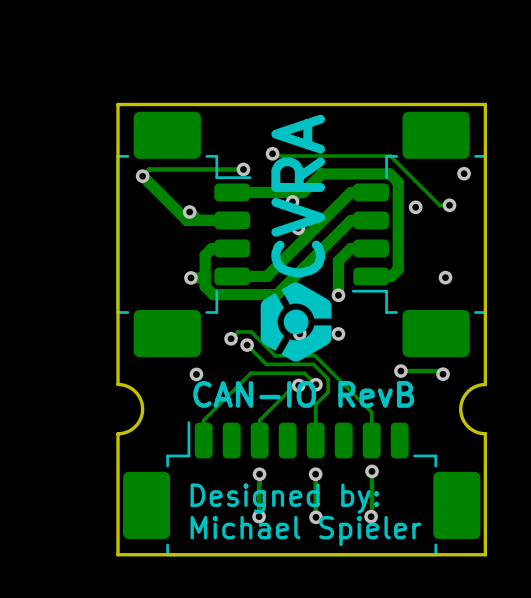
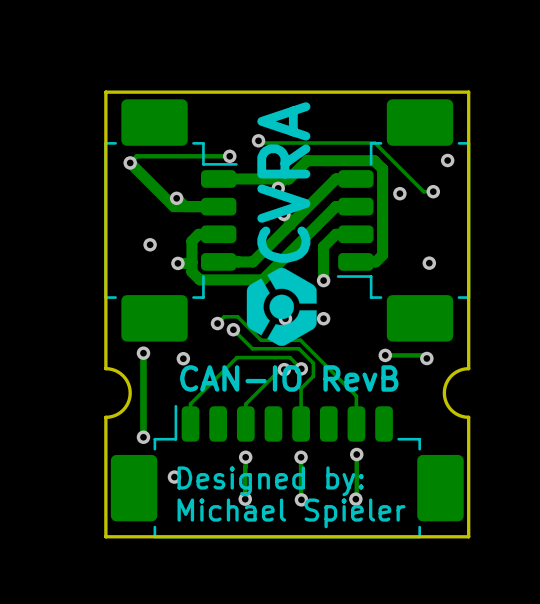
via: none -> (150, 244)
track: none -> (143, 353) (143, 437)
via: none -> (143, 353)
via: none -> (143, 437)
via: none -> (174, 477)

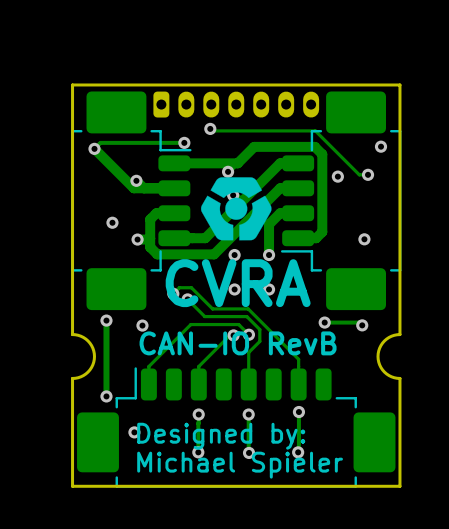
part: none -> (236, 104)
text rotation: 0° (283, 182) -> 90° clockwise (238, 283)
drawing: none -> [201, 177, 272, 241]
drawing: [246, 267, 317, 346] -> none

